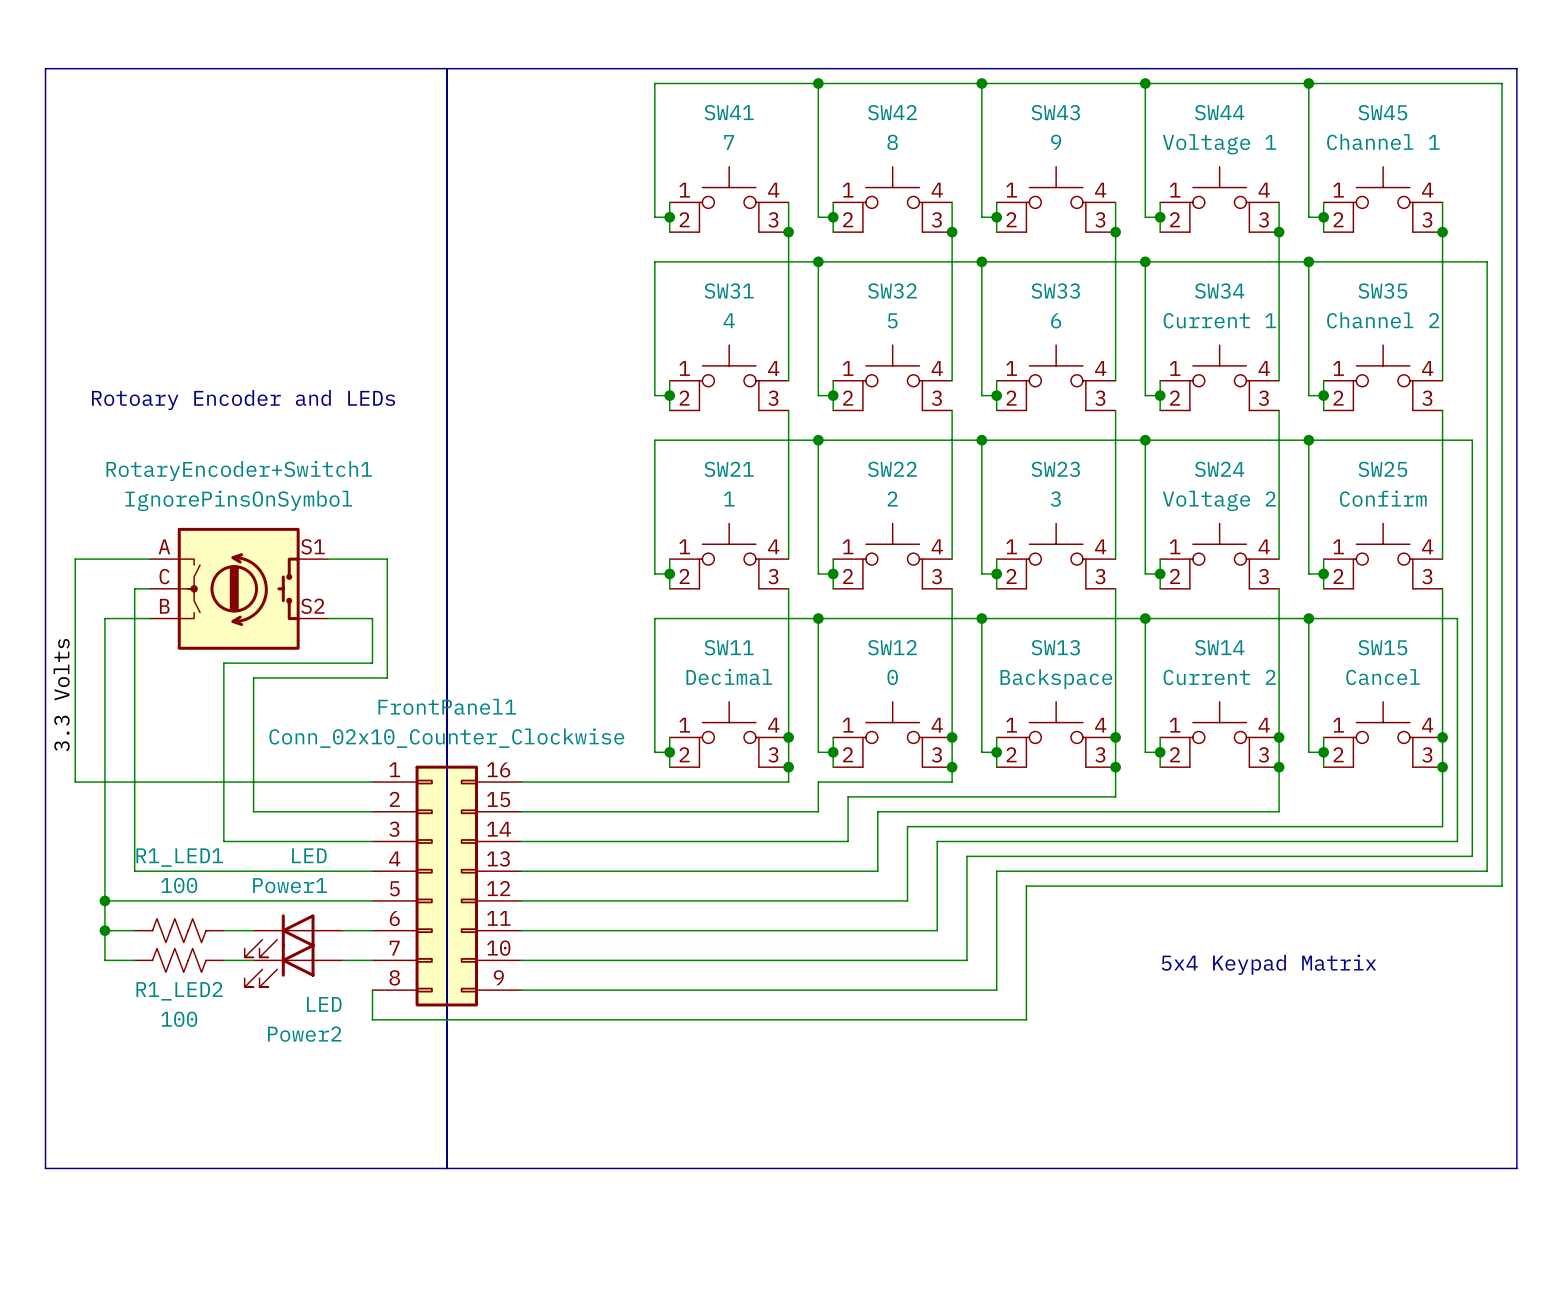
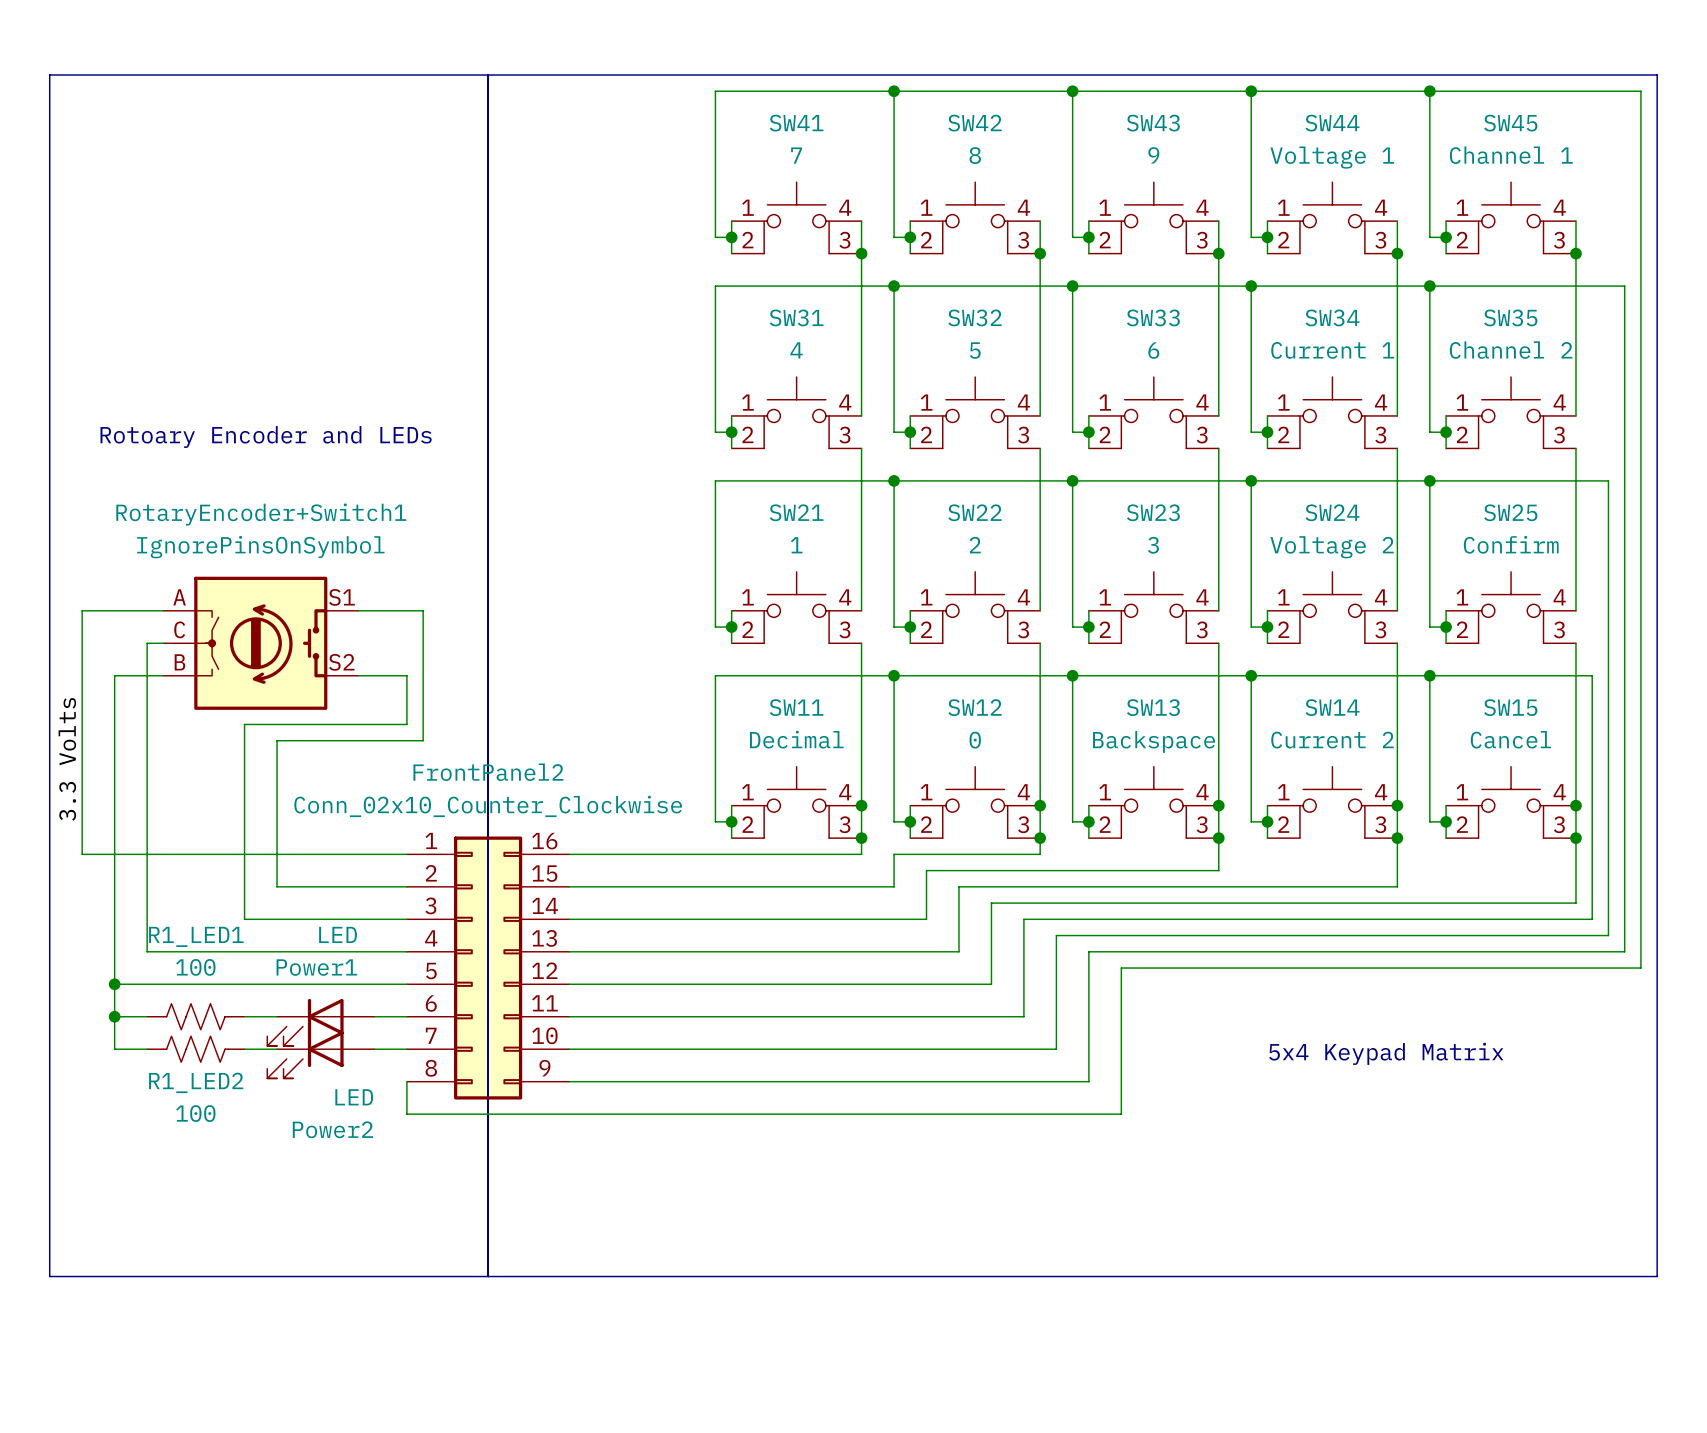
FrontPanel1 name: FrontPanel1 (447, 706) -> FrontPanel2 (488, 772)

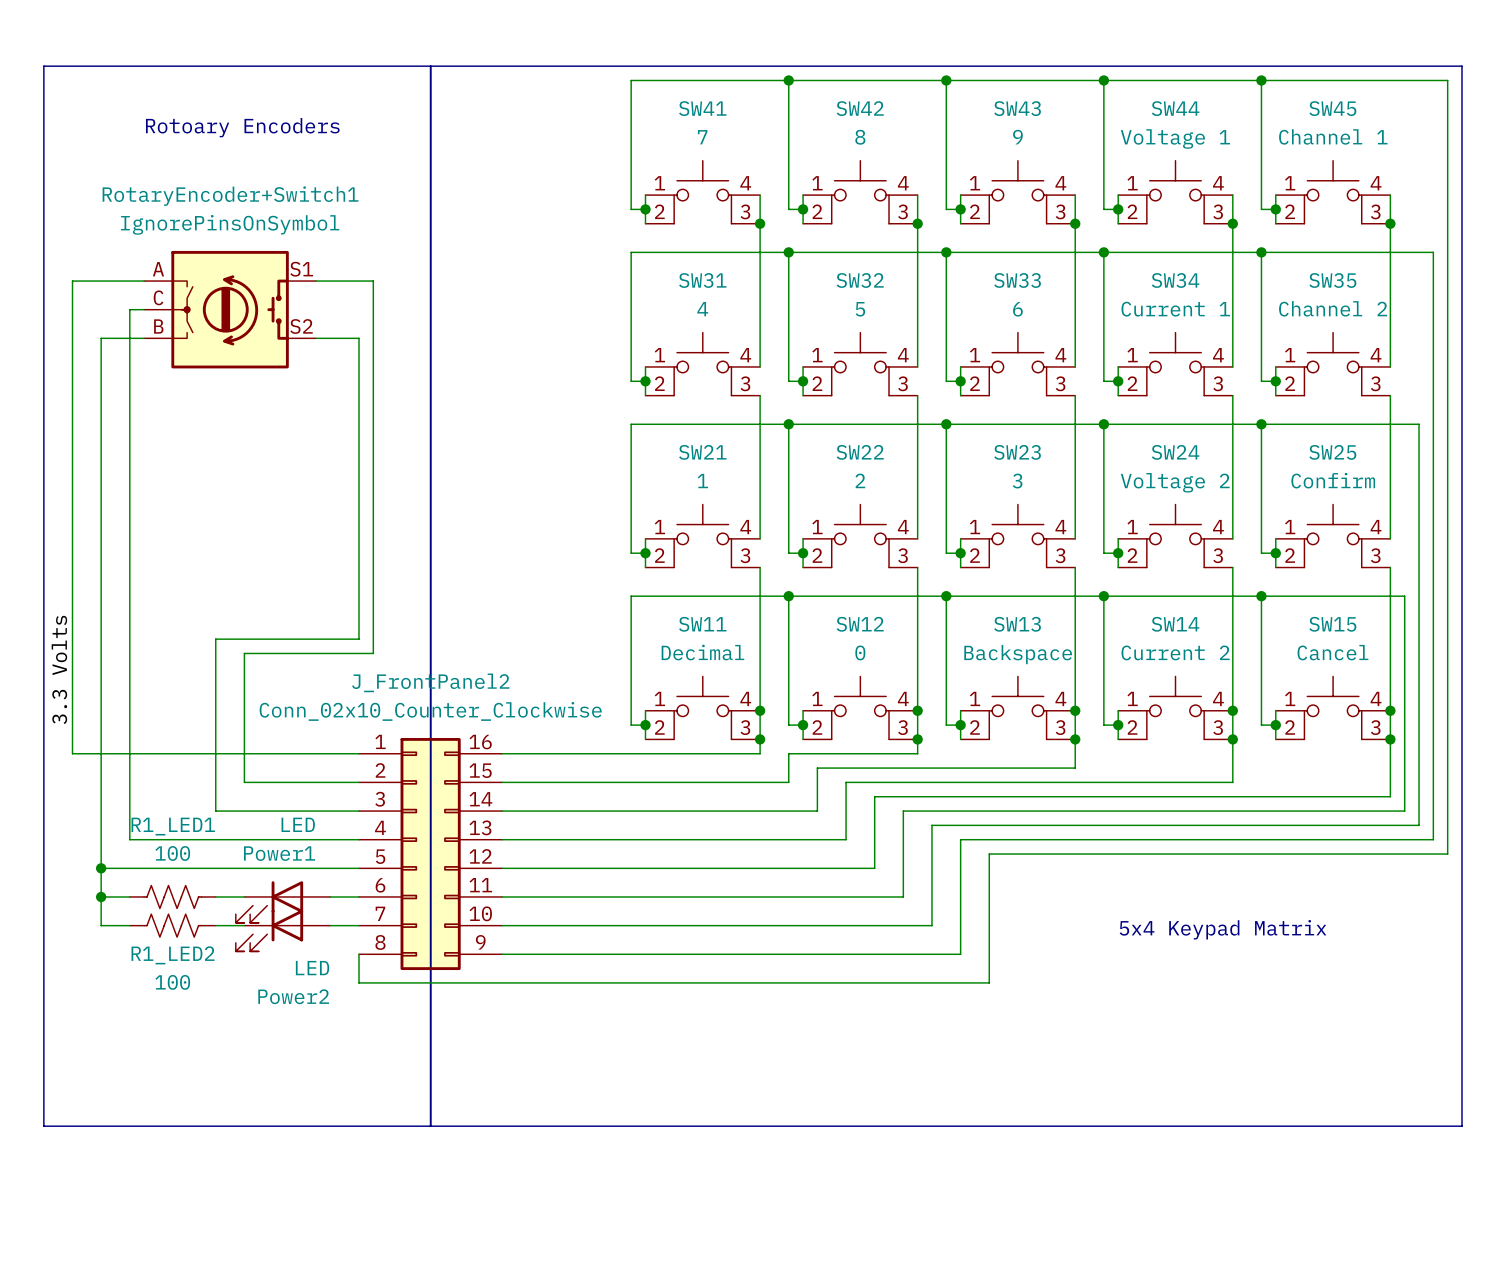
text: none -> Rotoary Encoders (242, 127)
text: Rotoary Encoder and LEDs (266, 436) -> none
wire: (82, 610) (163, 610) -> (72, 538) (72, 281) (144, 281)
wire: (358, 610) (423, 610) -> (316, 281) (373, 281) (373, 538)
wire: (147, 643) (163, 643) -> (129, 567) (129, 309) (144, 309)
RotaryEncoder+Switch1 position: (260, 643) -> (230, 309)
wire: (114, 675) (163, 675) -> (101, 596) (101, 338) (144, 338)
wire: (358, 675) (406, 675) -> (316, 338) (359, 338) (359, 596)
FrontPanel2 name: FrontPanel2 (488, 772) -> J_FrontPanel2 (430, 682)

